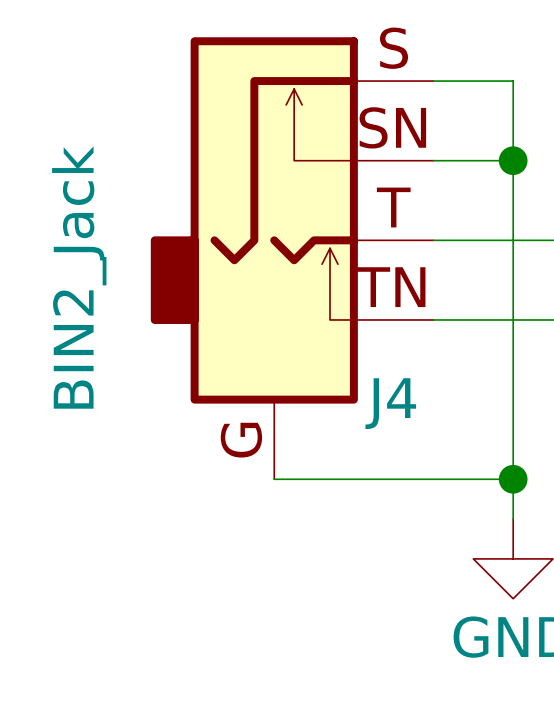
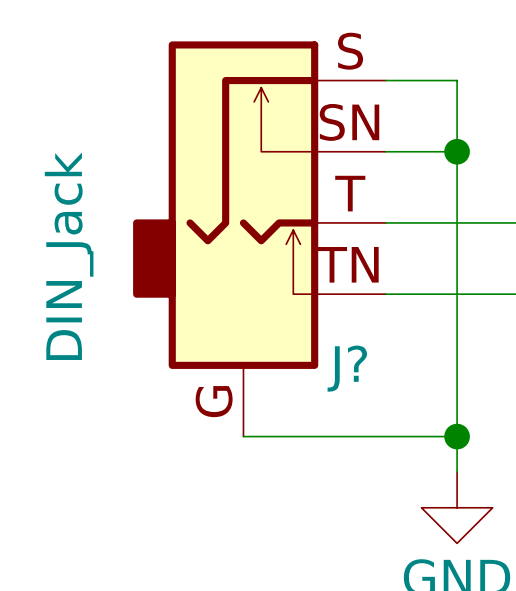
J4 value: BIN2_Jack (79, 277) -> DIN_Jack (69, 256)
J4 name: J4 (390, 403) -> J? (347, 368)

